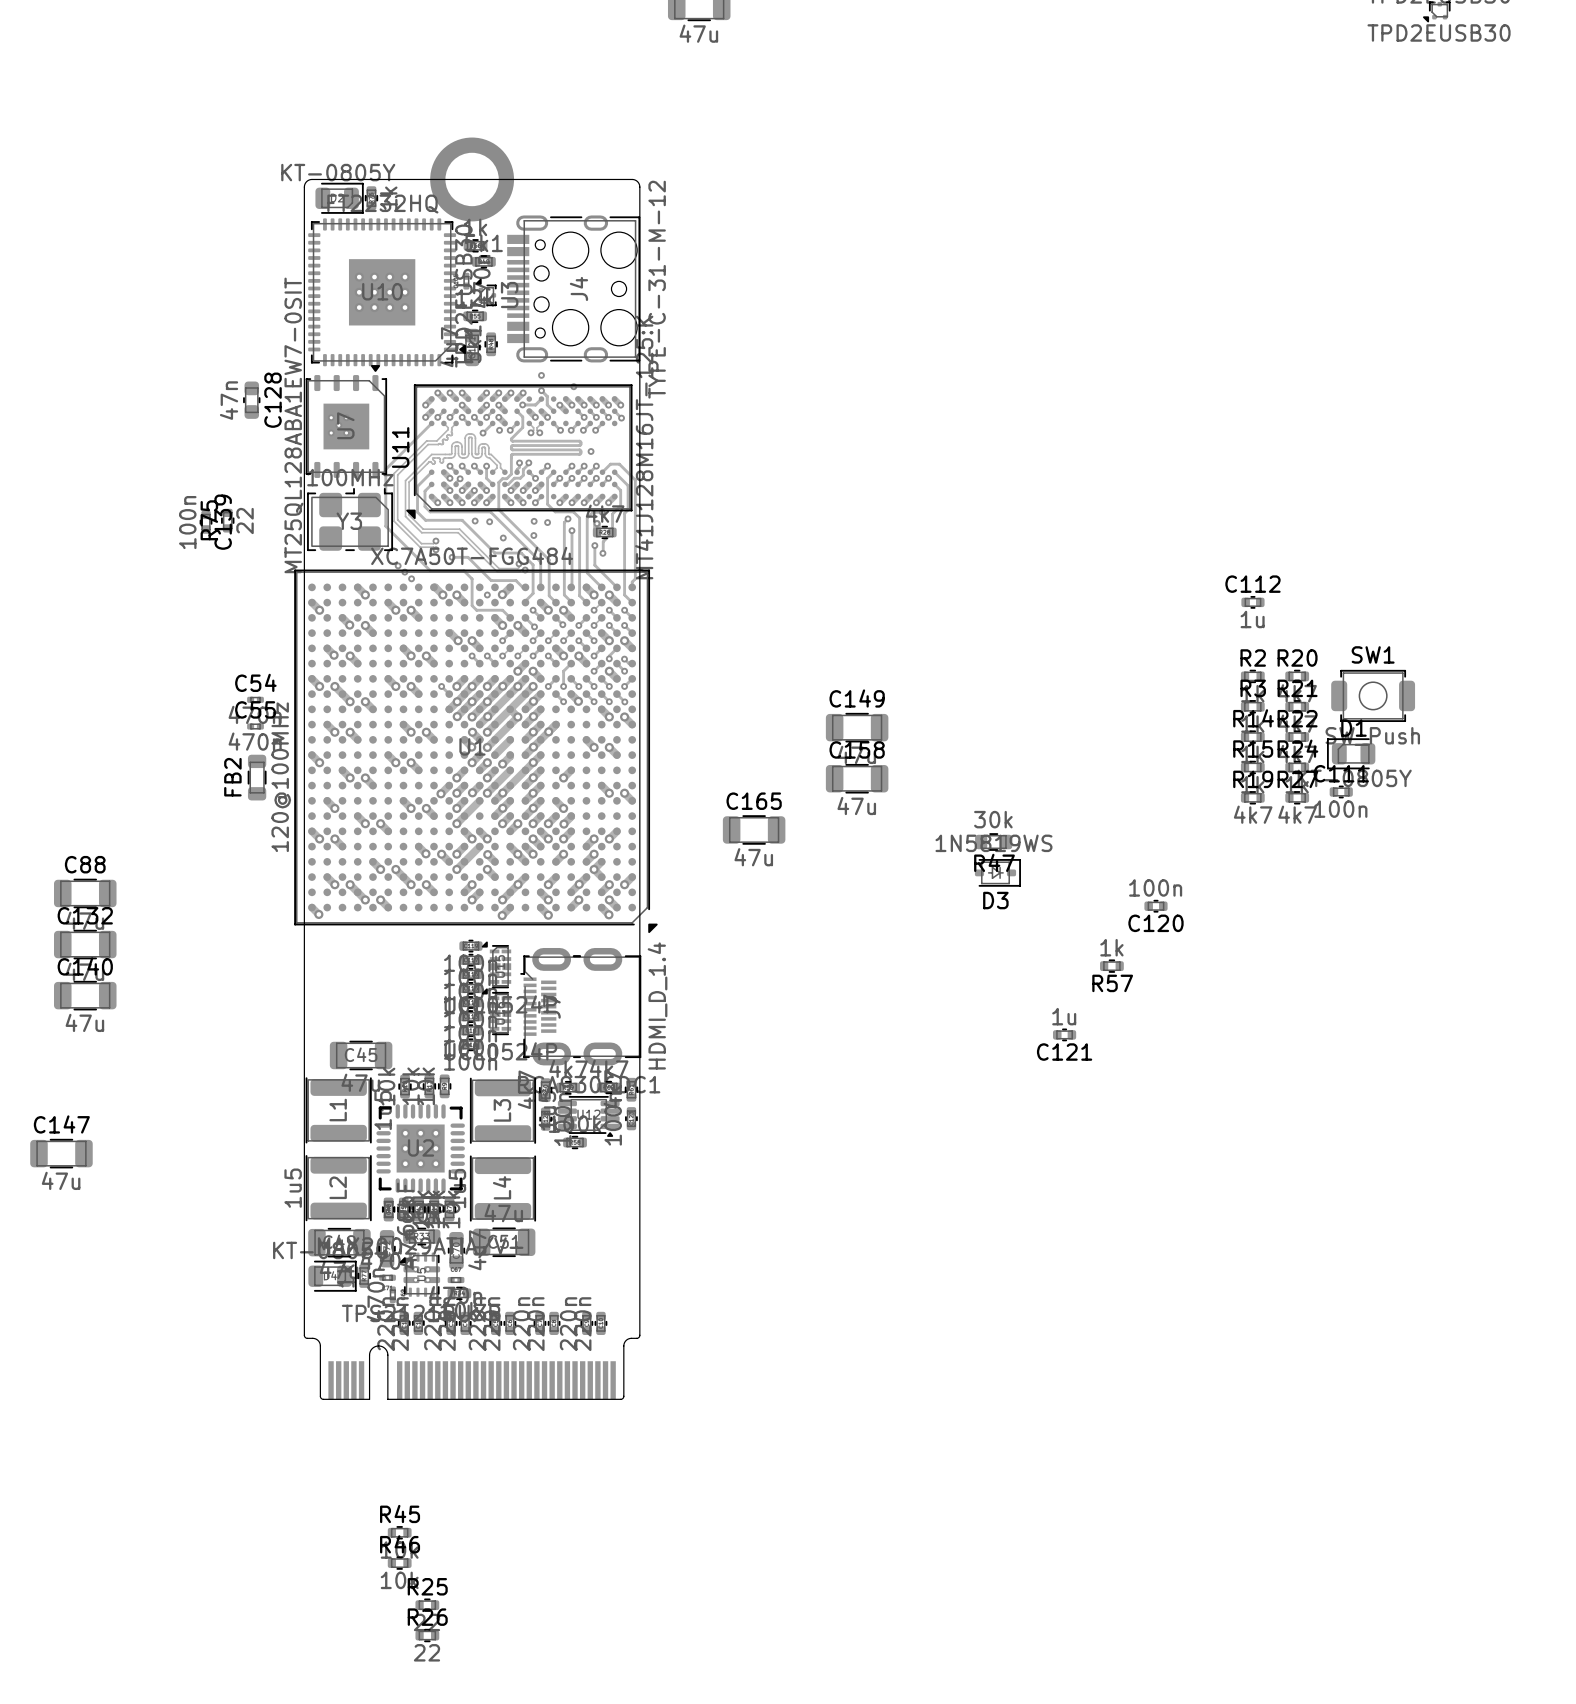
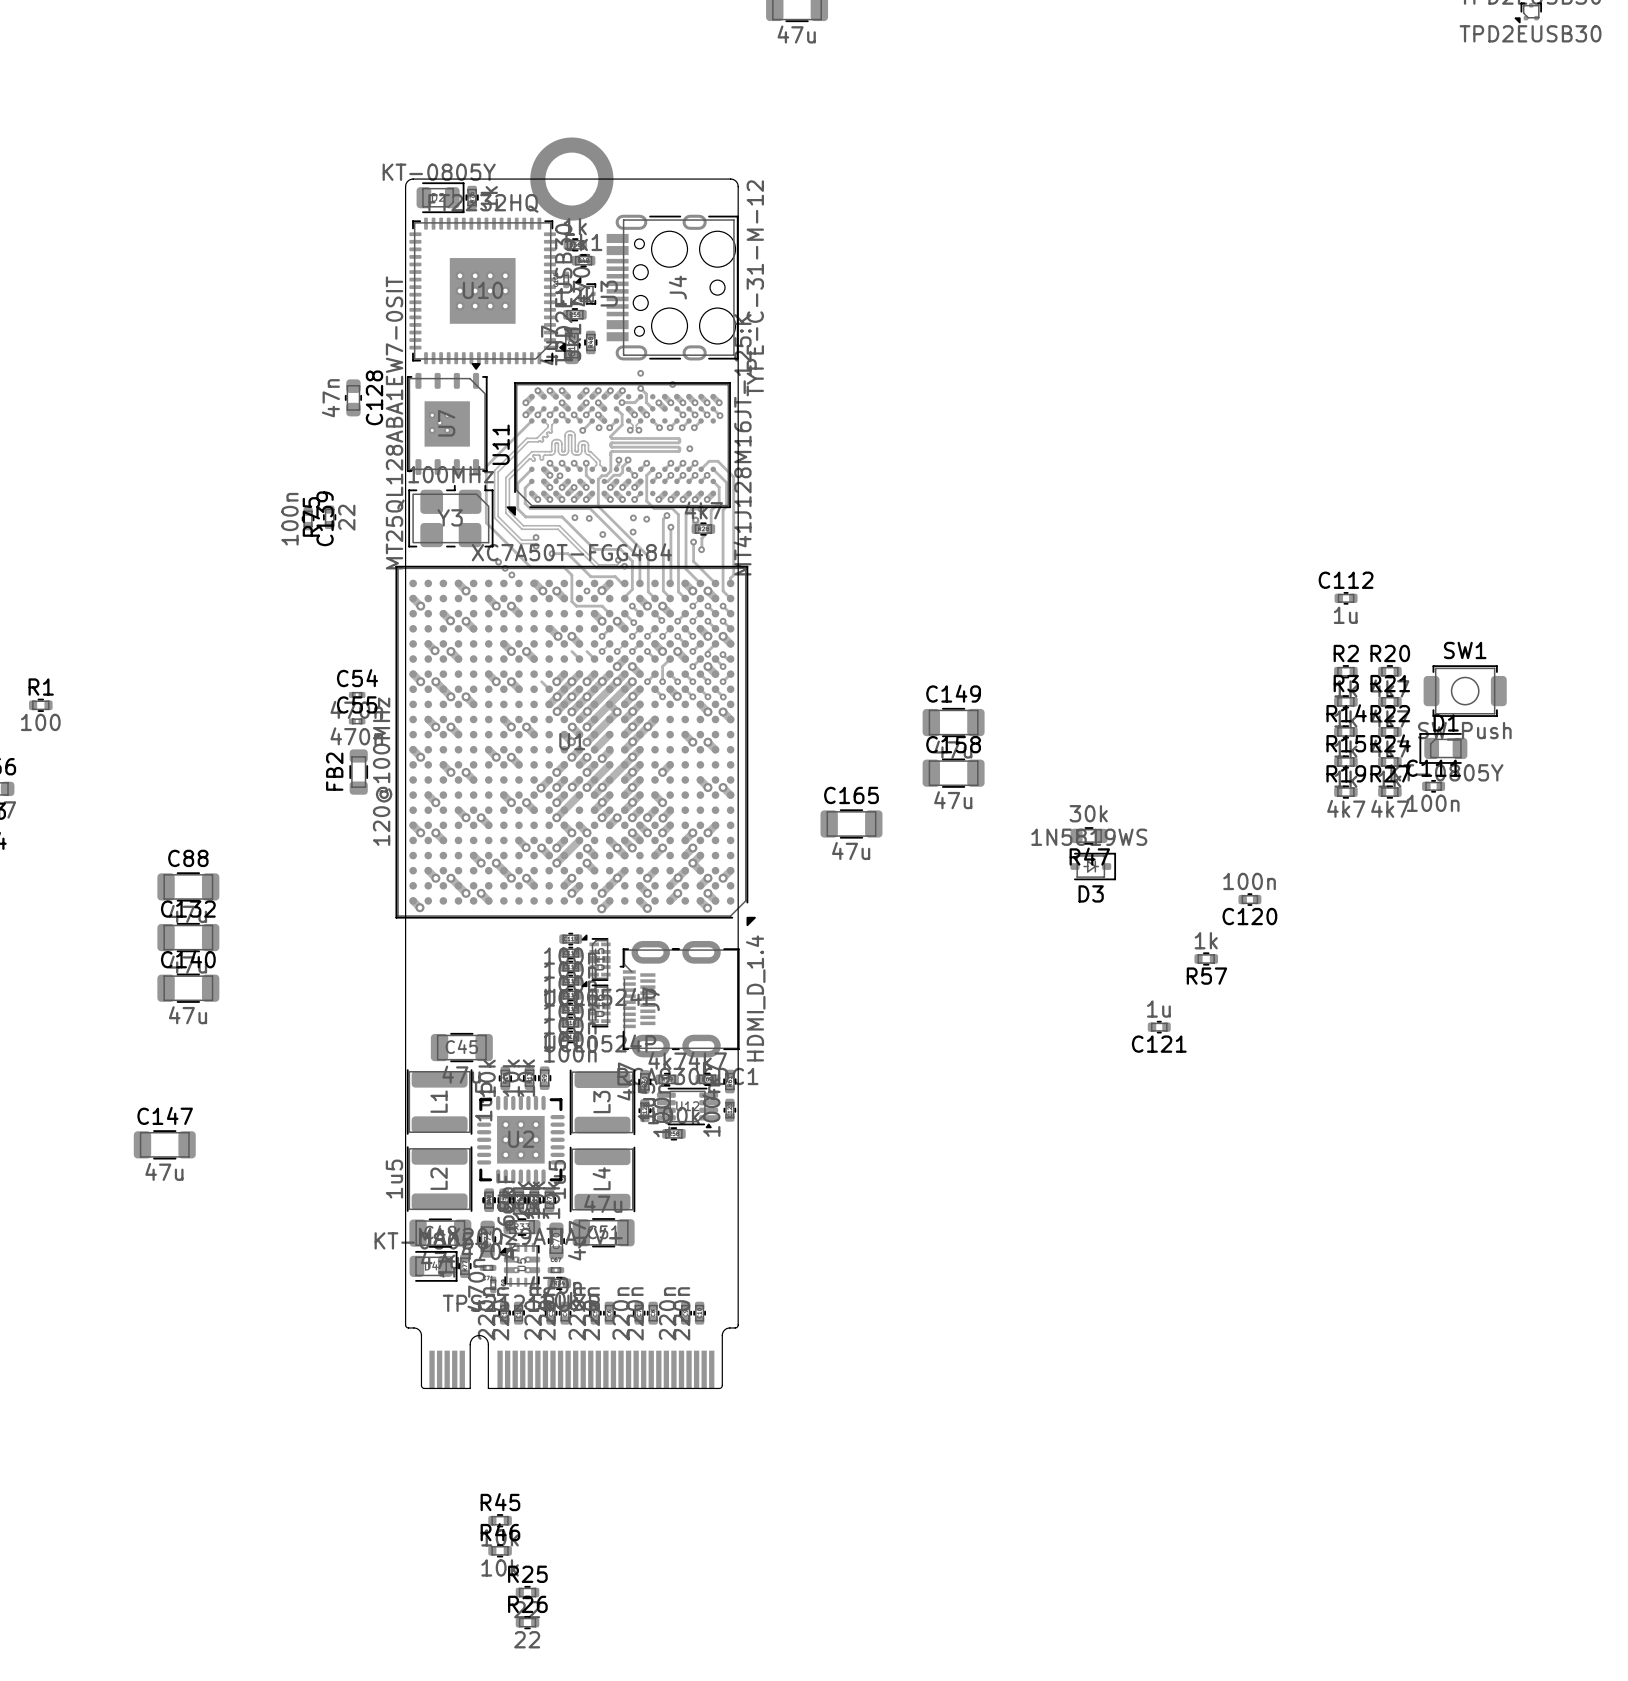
via: (472, 655) -> none
via: (487, 655) -> none
via: (441, 686) -> none

